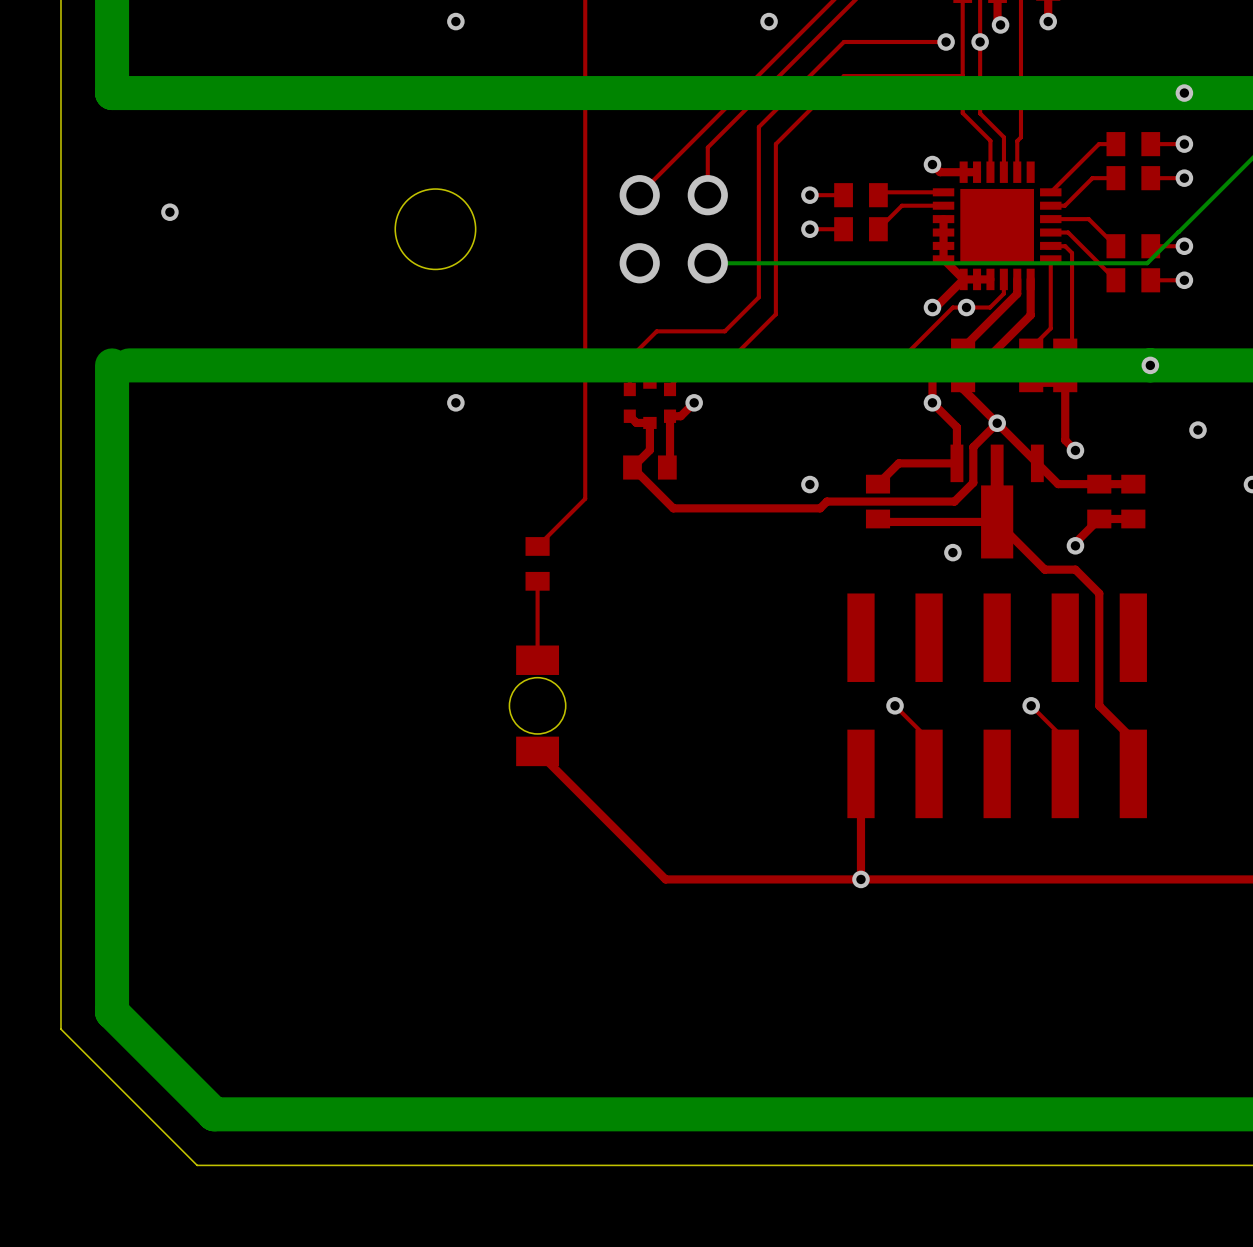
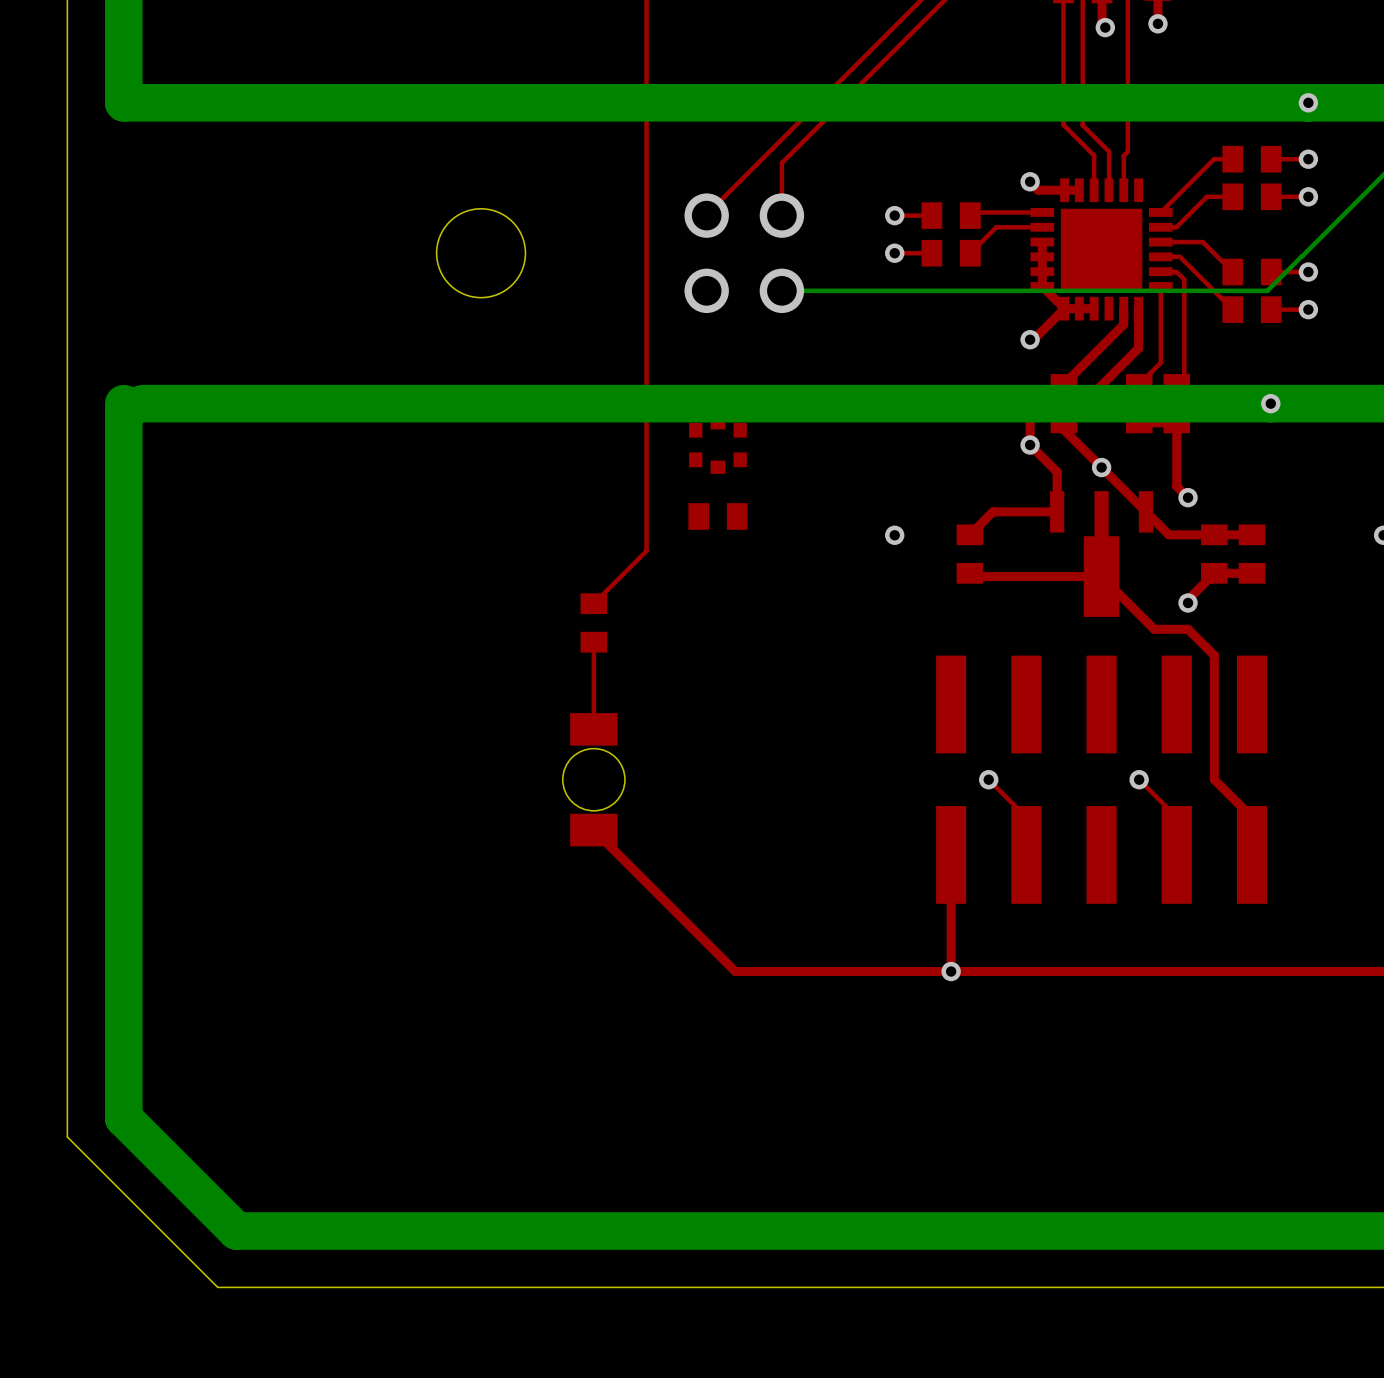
via: (455, 21) -> none
via: (769, 21) -> none
top track: (946, 41) (843, 41) (758, 127) (758, 297) (724, 331) (656, 331) (629, 358) (629, 389) -> none
via: (946, 41) -> none
via: (980, 41) -> none
top track: (962, 76) (843, 76) (775, 144) (775, 314) (724, 365) (690, 365) (670, 386) (670, 389) -> none
via: (169, 212) -> none
top track: (1003, 279) (1003, 293) (990, 307) (952, 307) (905, 355) (884, 355) -> none
via: (966, 307) -> none
via: (455, 402) -> none
top track: (694, 402) (680, 416) (670, 416) -> none
via: (694, 402) -> none
top track: (629, 416) (636, 422) (649, 422) (649, 450) (632, 467) (673, 508) (820, 508) (826, 501) (954, 501) (973, 482) (973, 447) (997, 423) -> none
top track: (670, 416) (670, 464) (667, 467) -> none
via: (1198, 430) -> none
via: (952, 552) -> none

